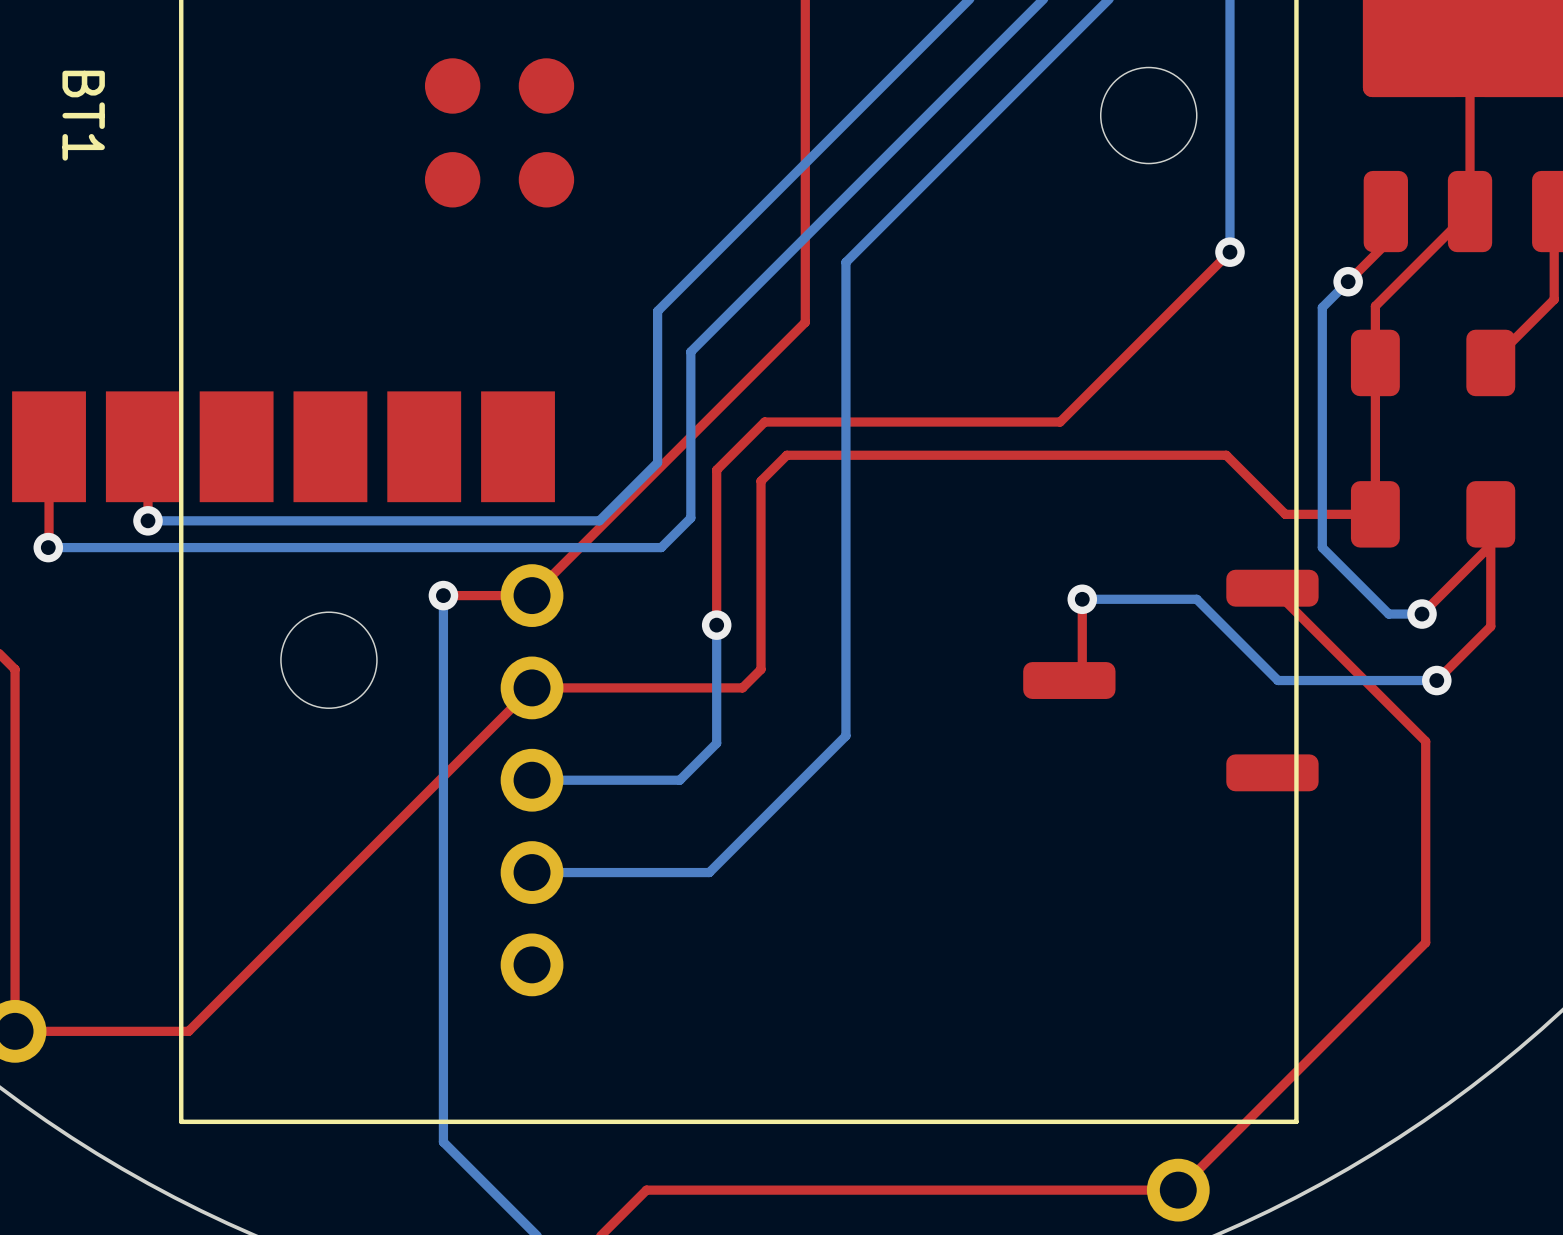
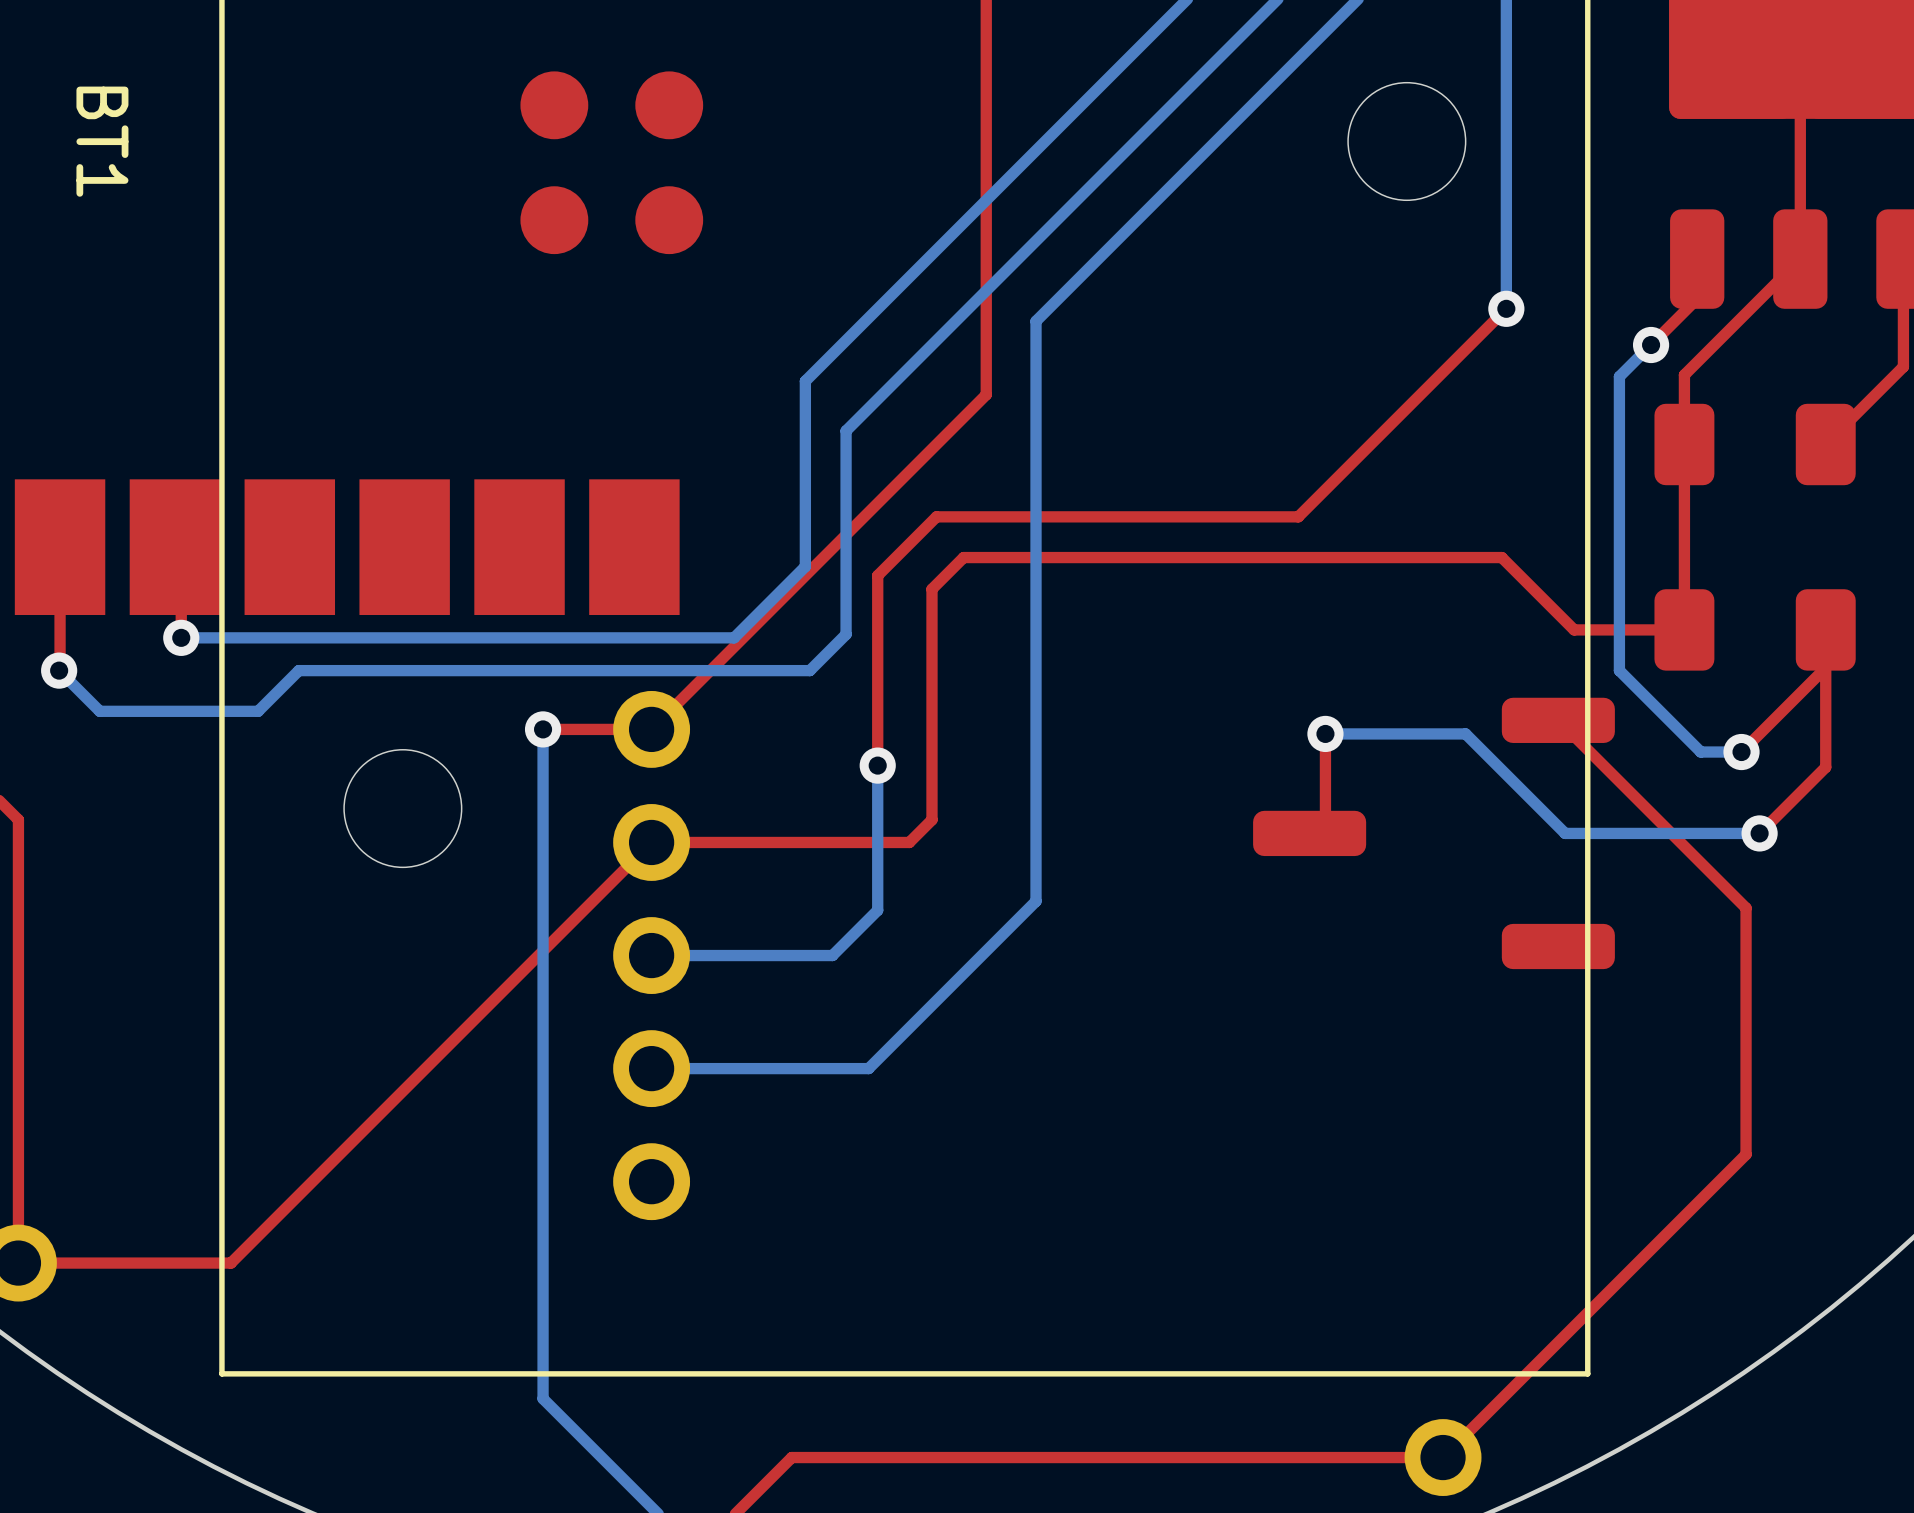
bottom track: (244, 547) (48, 547) -> (298, 670) (258, 711) (99, 711) (59, 670)

